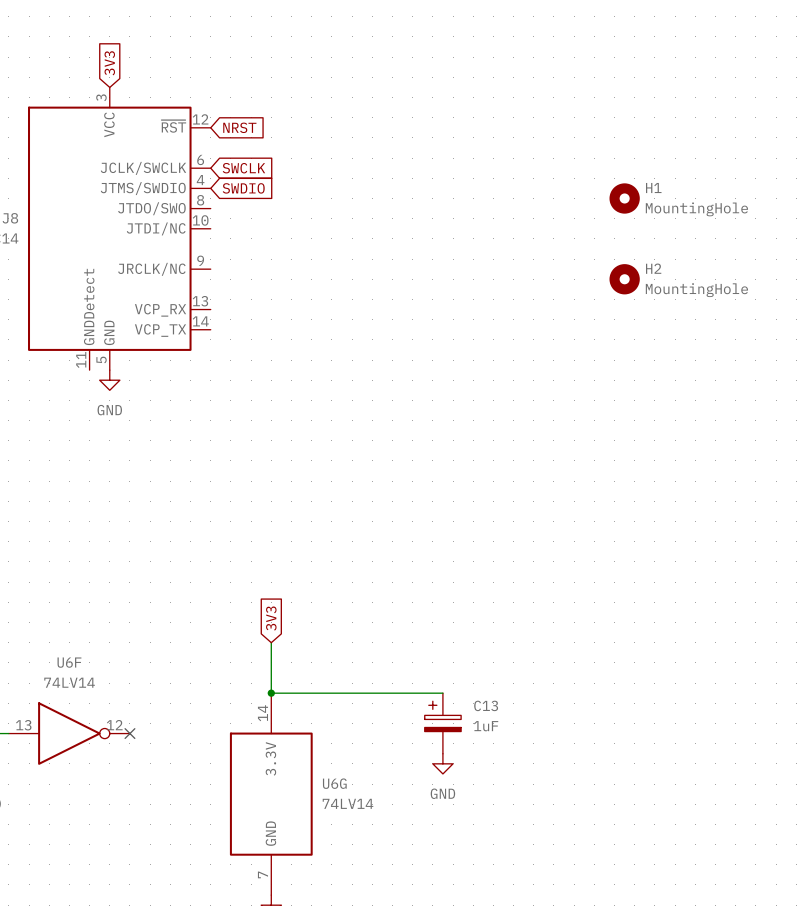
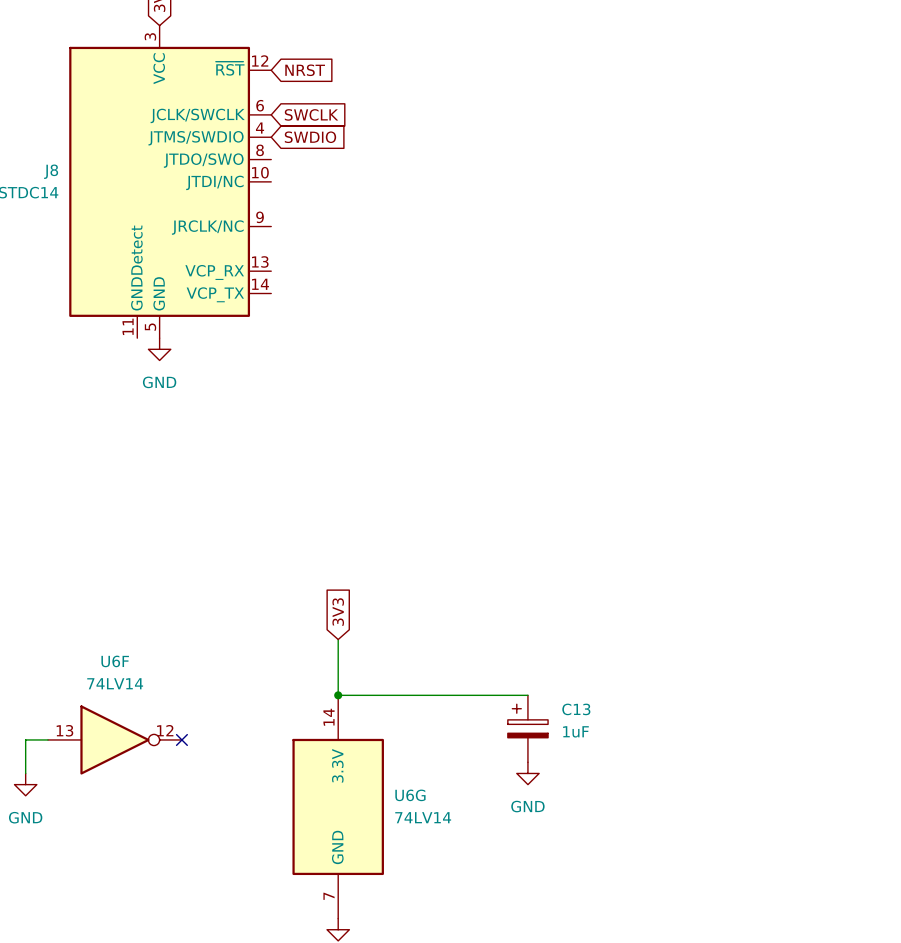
H1: MountingHole (624, 198) -> none
H2: MountingHole (624, 279) -> none

